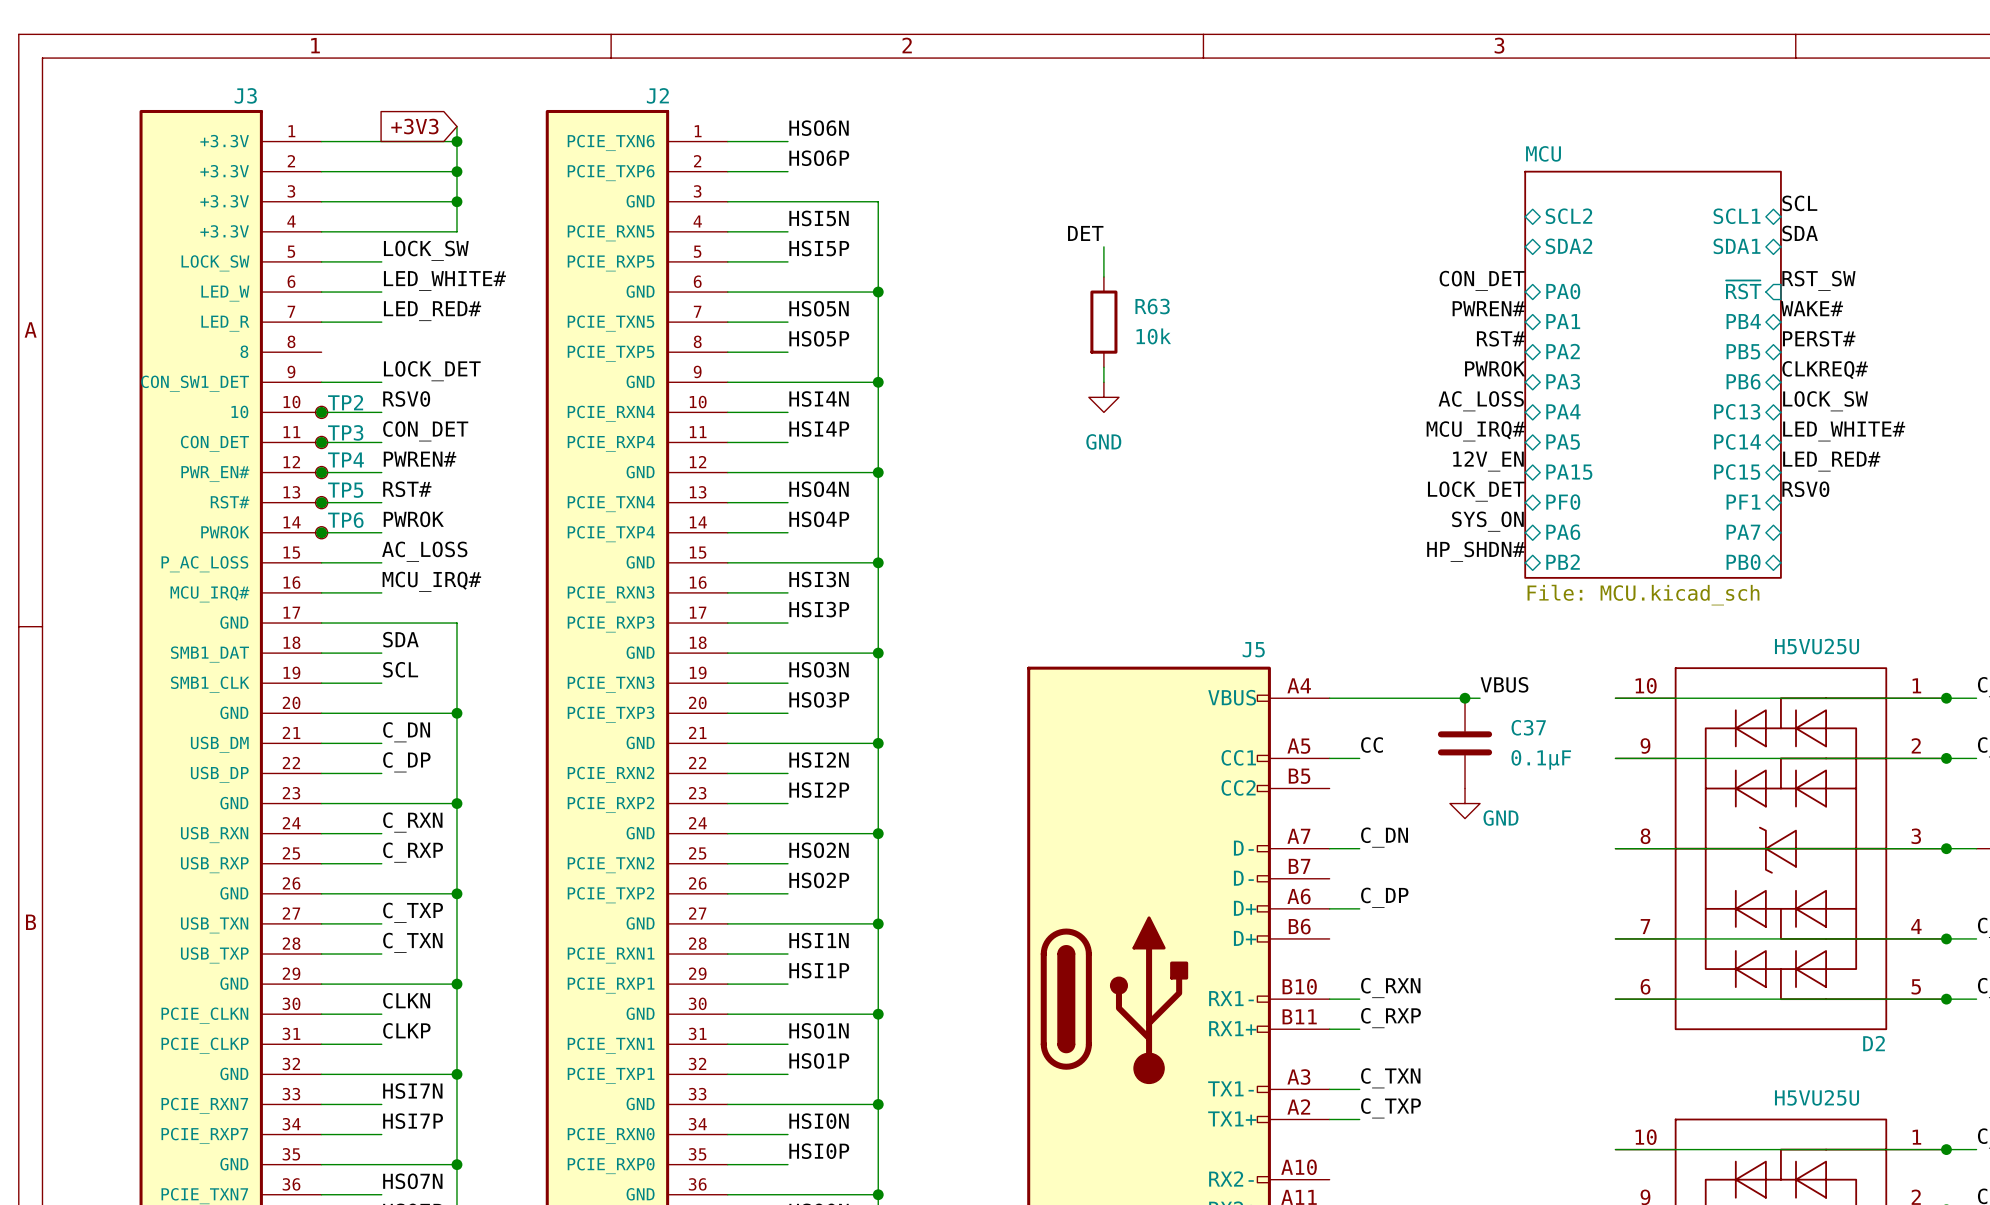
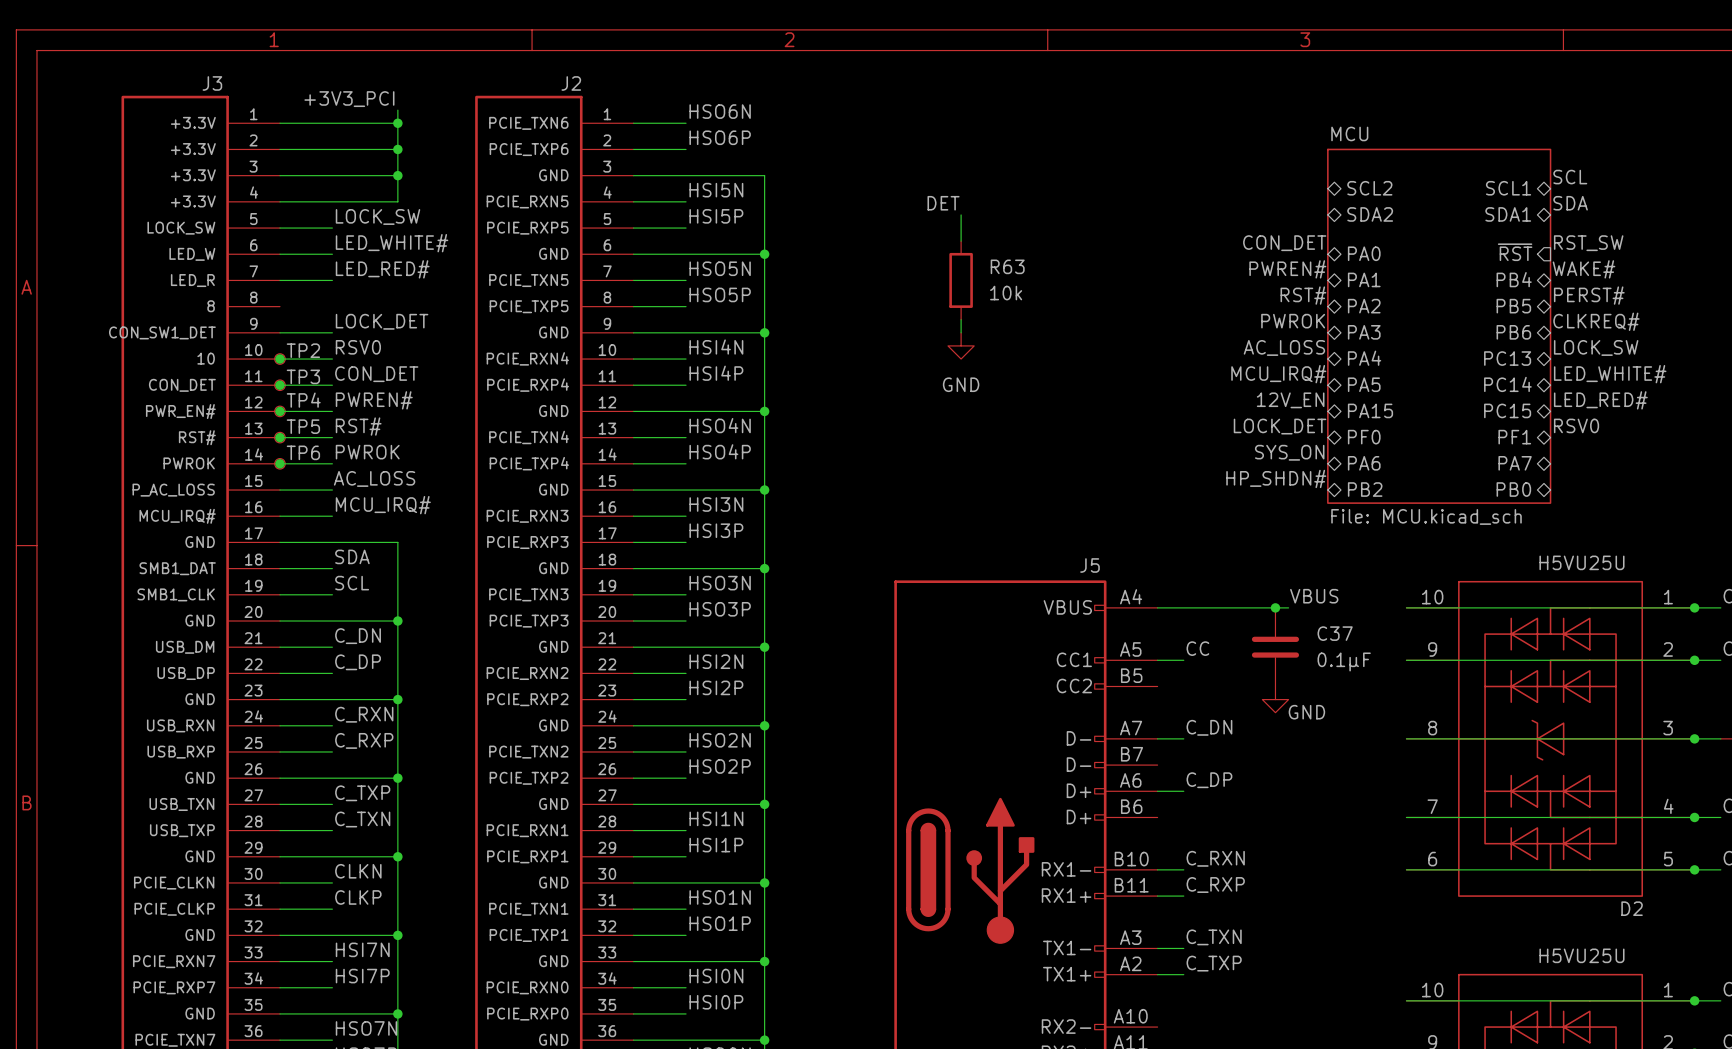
label: none -> +3V3_PCI (349, 99)
global label: +3V3 (414, 126) -> none

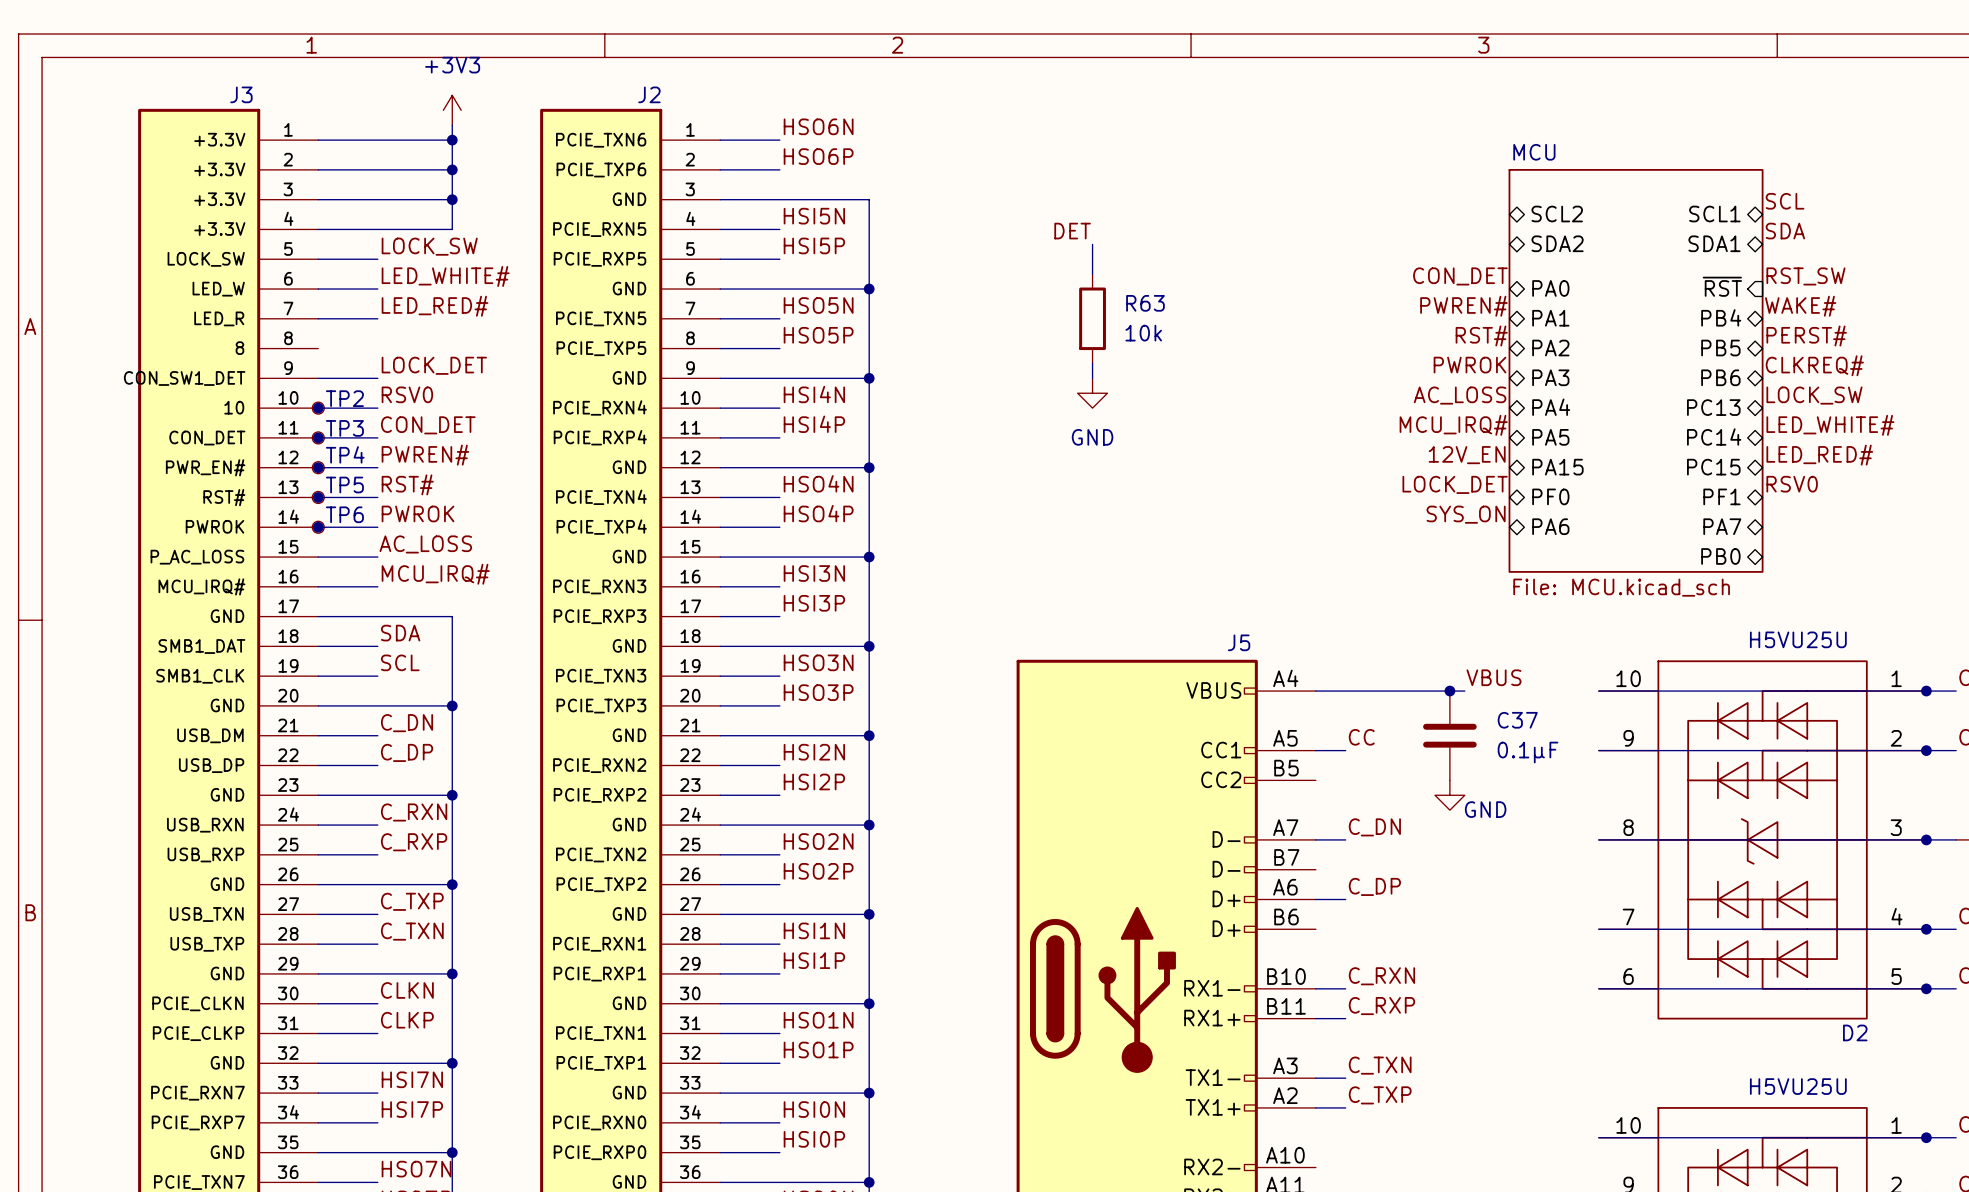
power symbol: none -> +3V3 (452, 110)
label: +3V3_PCI (349, 99) -> none
label: HP_SHDN# (1276, 478) -> none
sheet pin: PB2 (1365, 489) -> none

